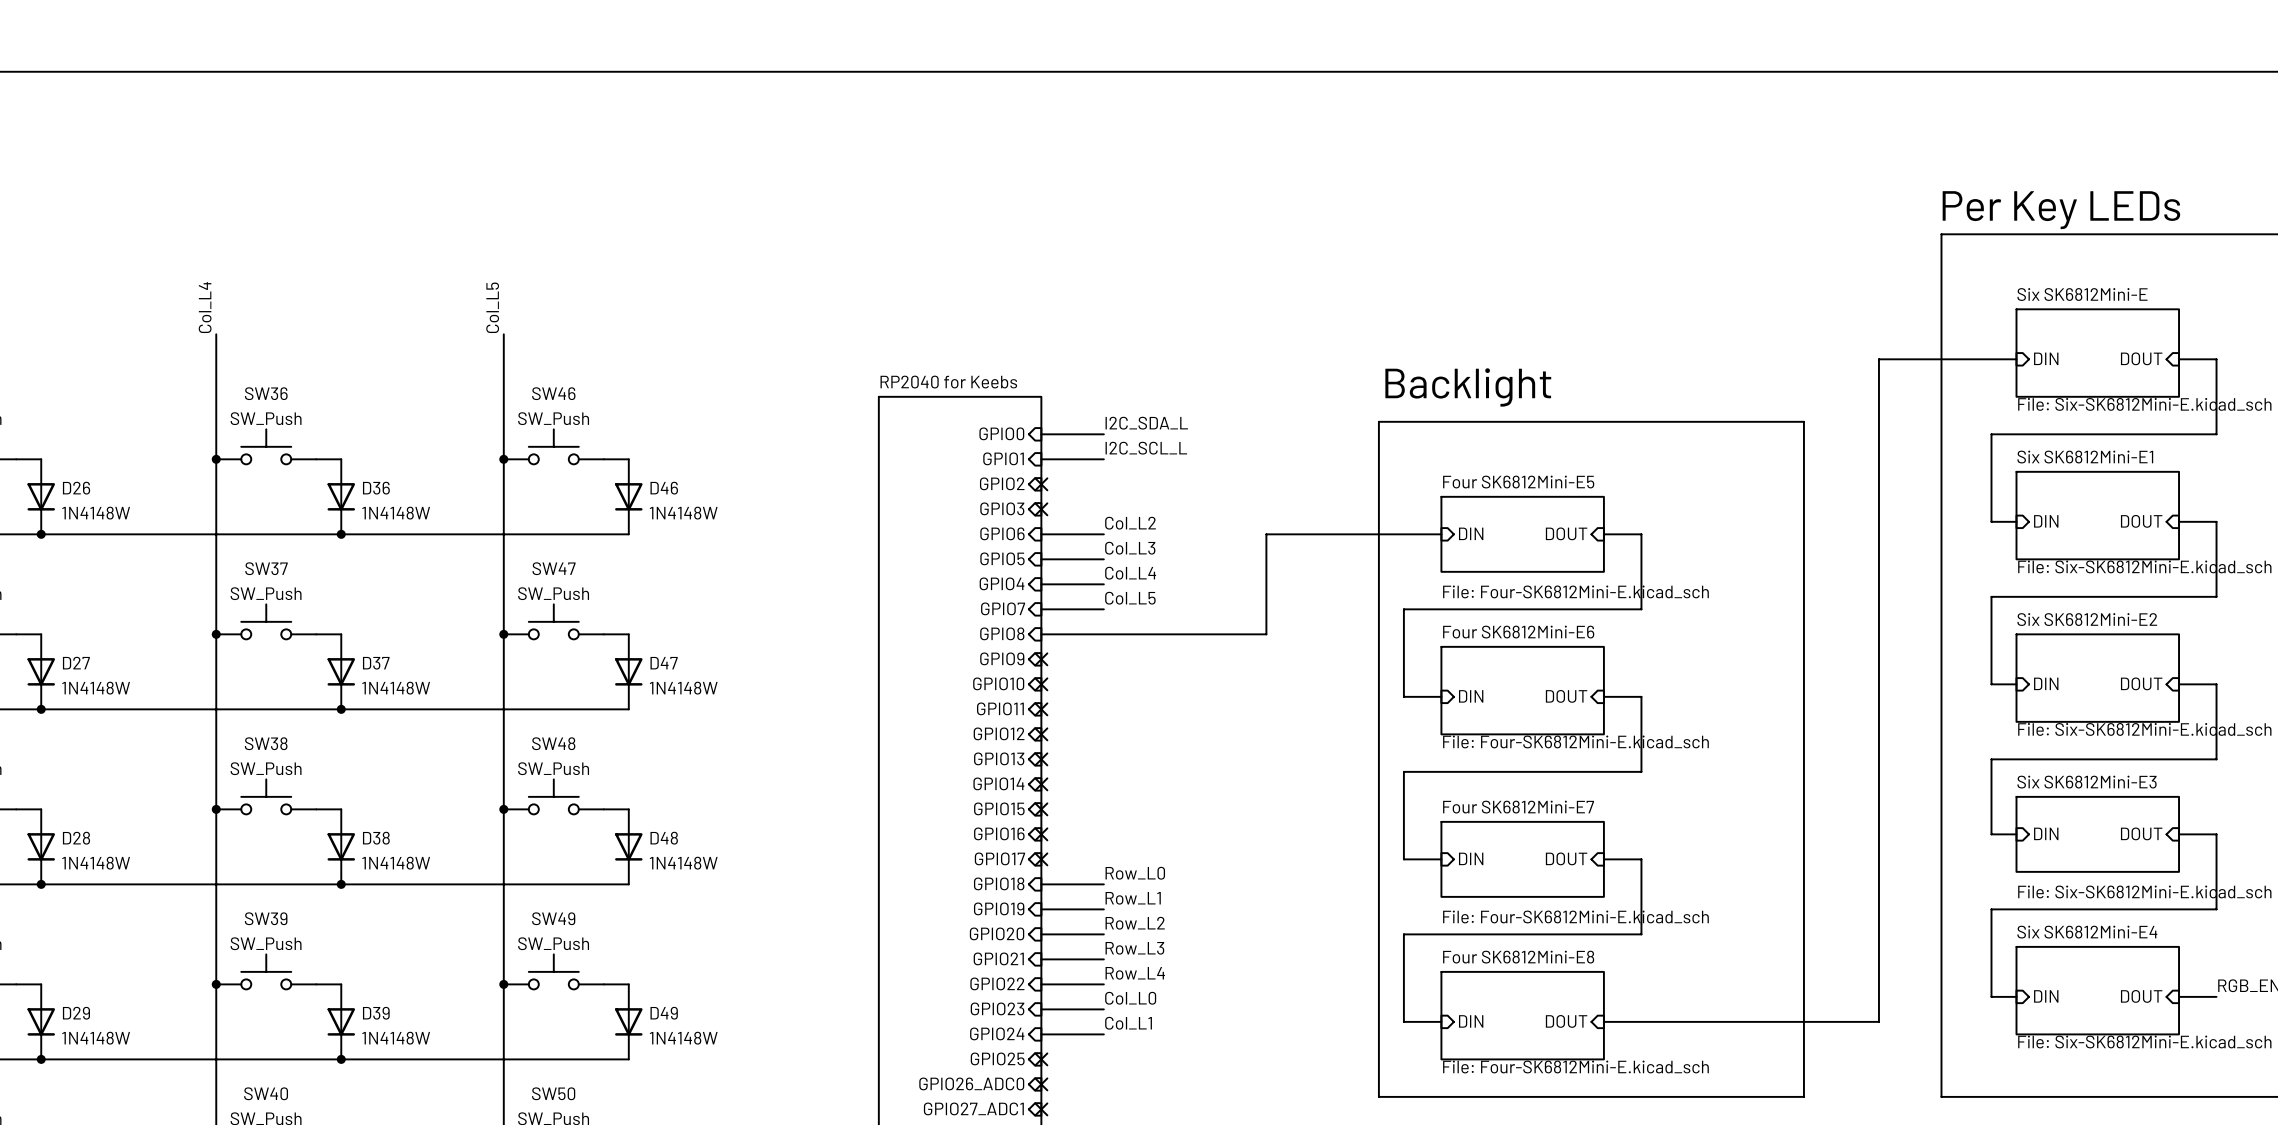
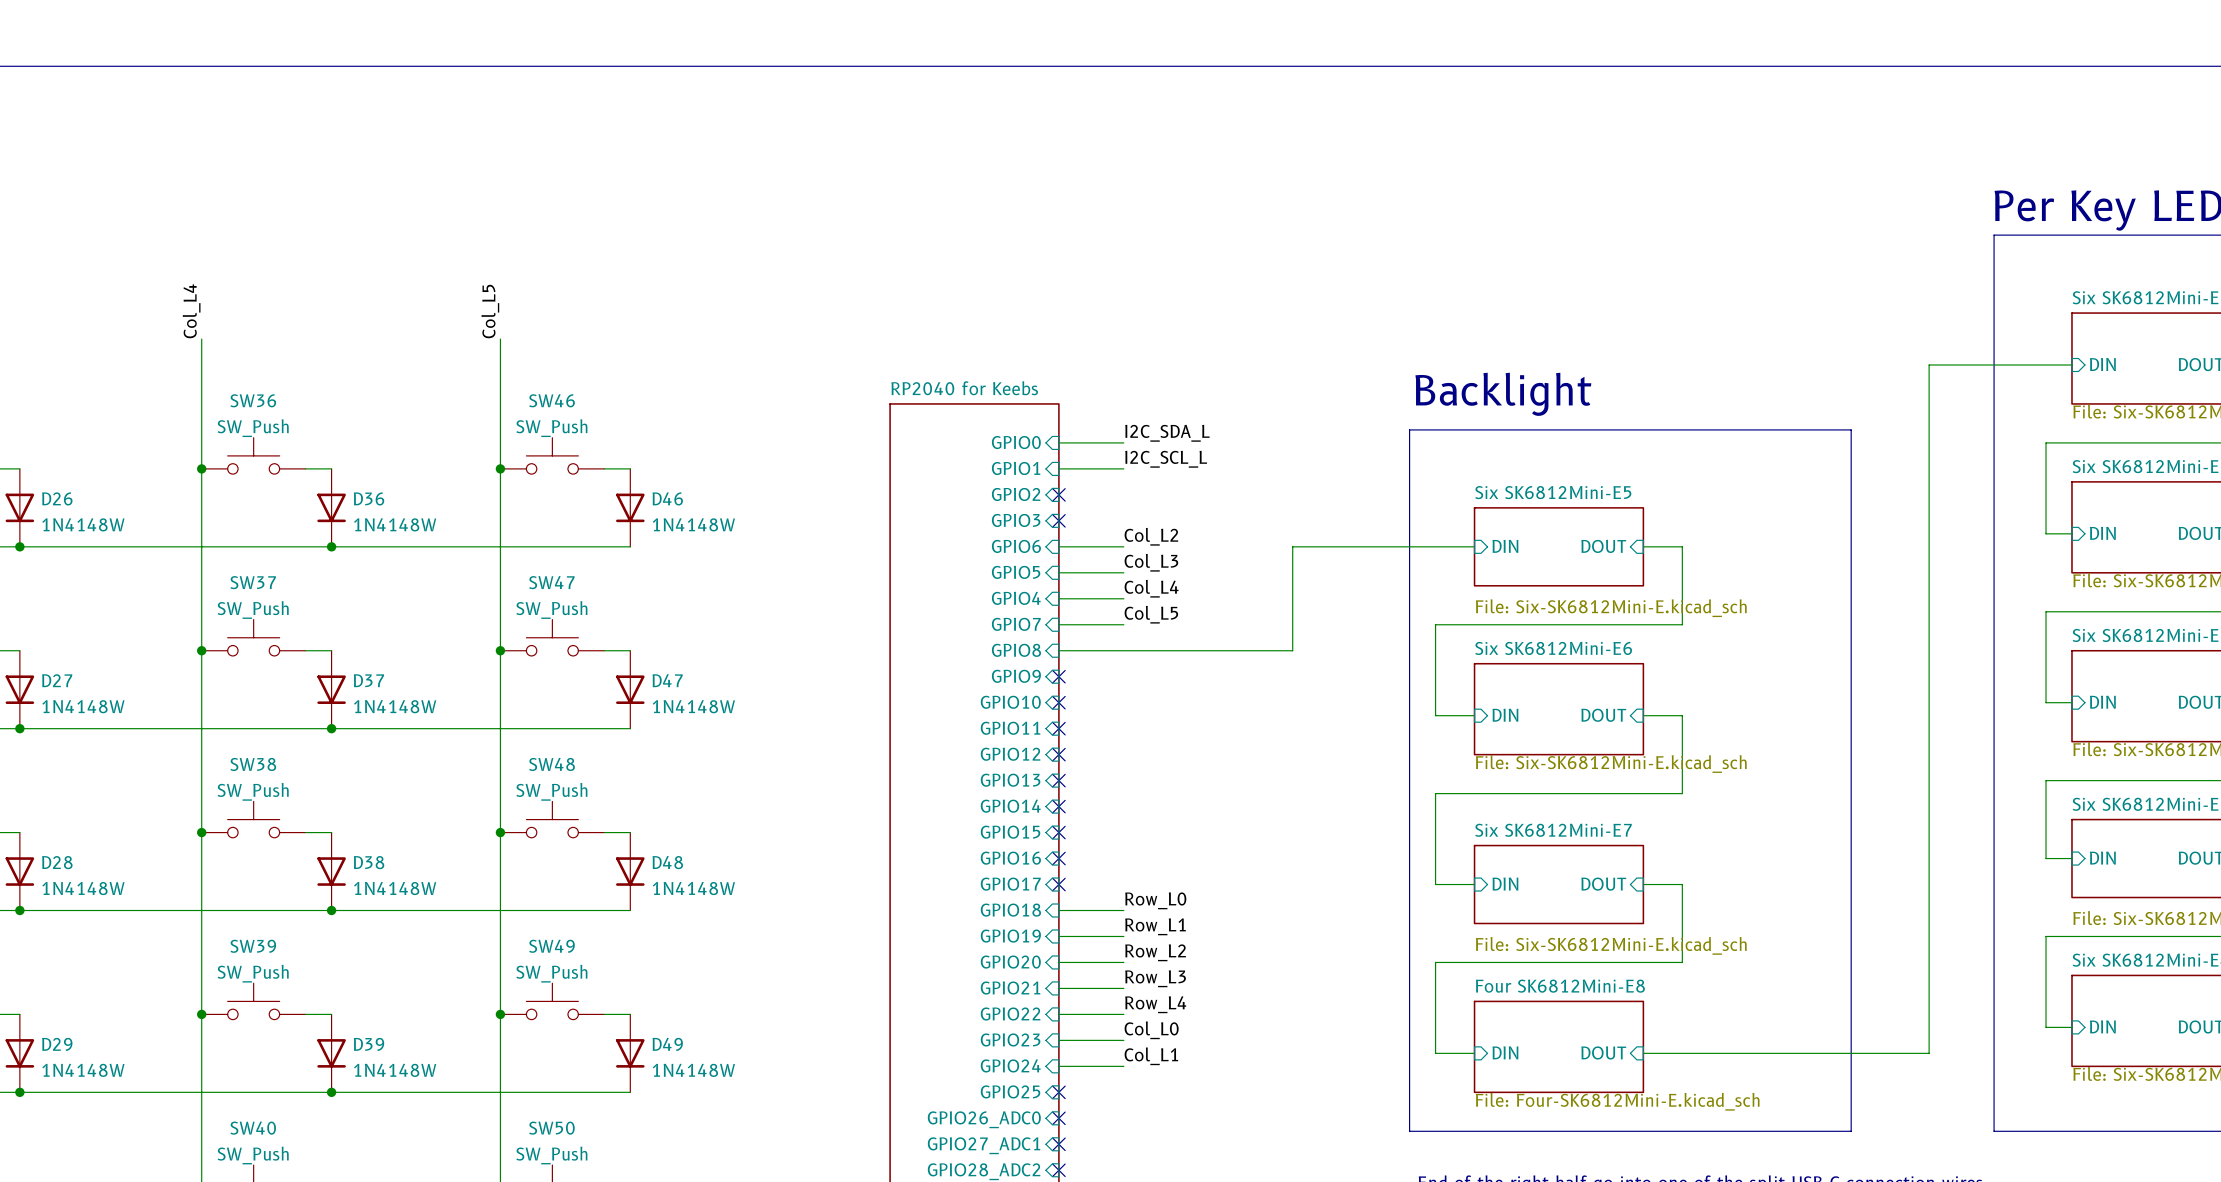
sheet Four SK6812Mini-E5 name: Four SK6812Mini-E5 (1518, 482) -> Six SK6812Mini-E5 (1553, 492)
sheet Four SK6812Mini-E5 value: File: Four-SK6812Mini-E.kicad_sch (1575, 591) -> File: Six-SK6812Mini-E.kicad_sch (1611, 608)
sheet Four SK6812Mini-E6 name: Four SK6812Mini-E6 (1518, 632) -> Six SK6812Mini-E6 (1553, 648)
sheet Four SK6812Mini-E6 value: File: Four-SK6812Mini-E.kicad_sch (1575, 741) -> File: Six-SK6812Mini-E.kicad_sch (1611, 764)
sheet Four SK6812Mini-E7 name: Four SK6812Mini-E7 (1518, 807) -> Six SK6812Mini-E7 (1553, 830)
sheet Four SK6812Mini-E7 value: File: Four-SK6812Mini-E.kicad_sch (1575, 916) -> File: Six-SK6812Mini-E.kicad_sch (1611, 945)

